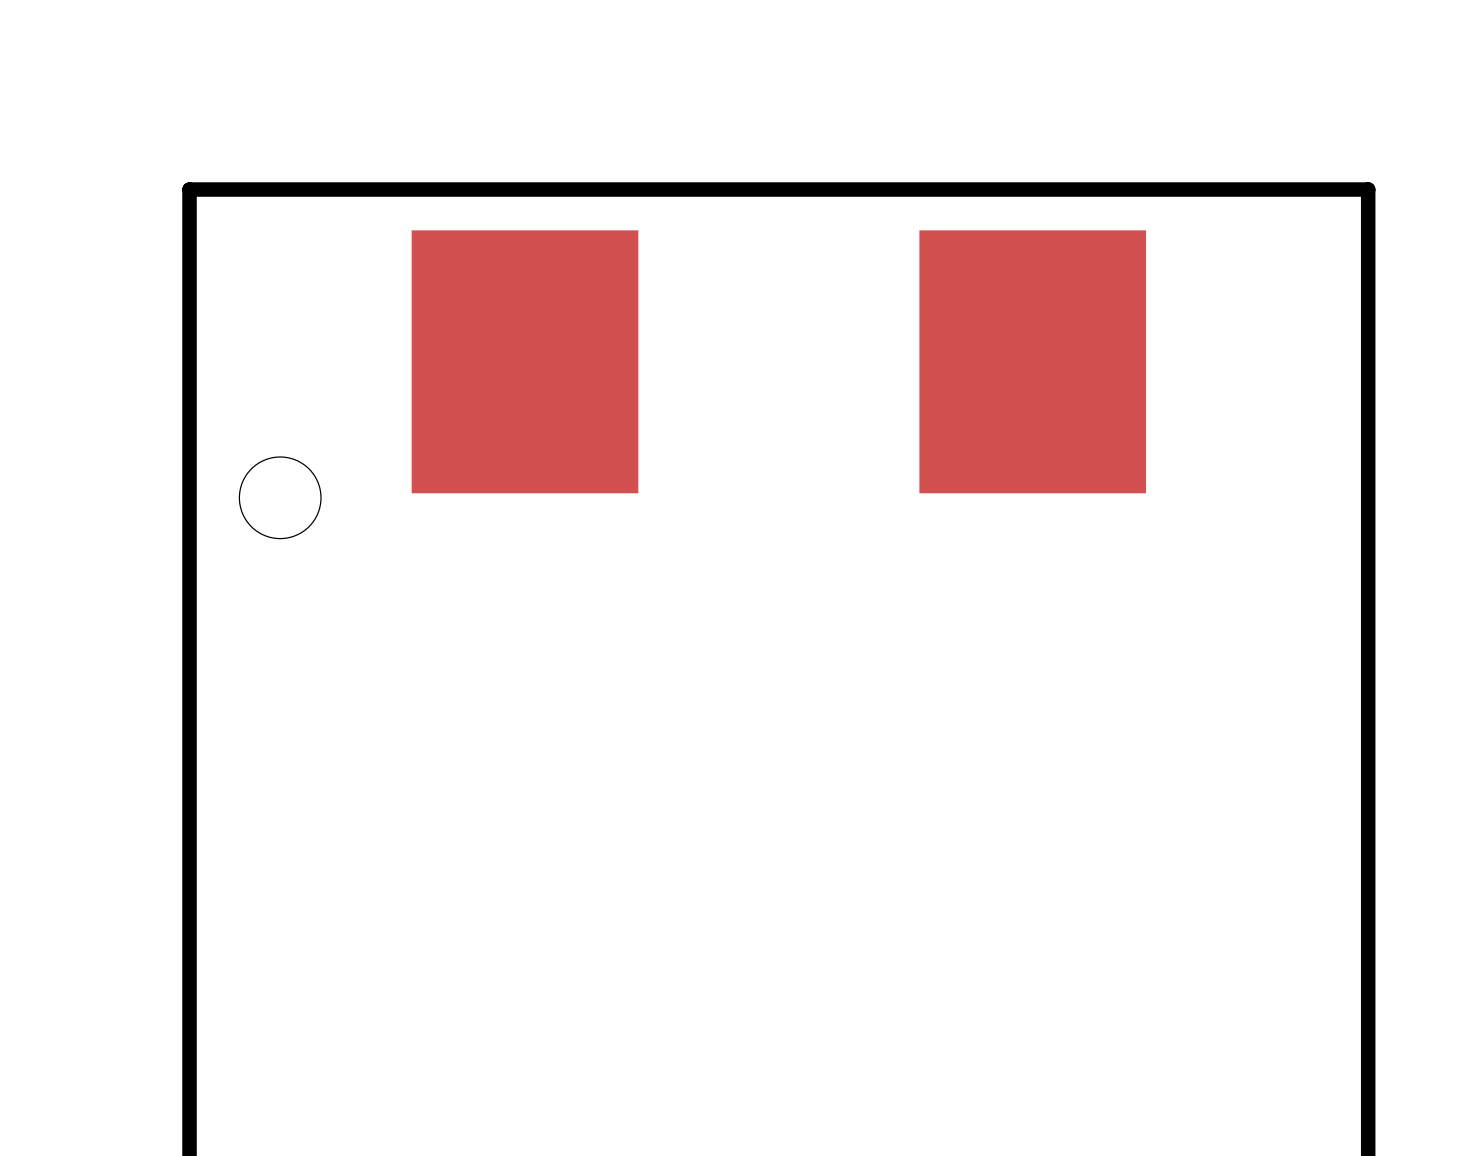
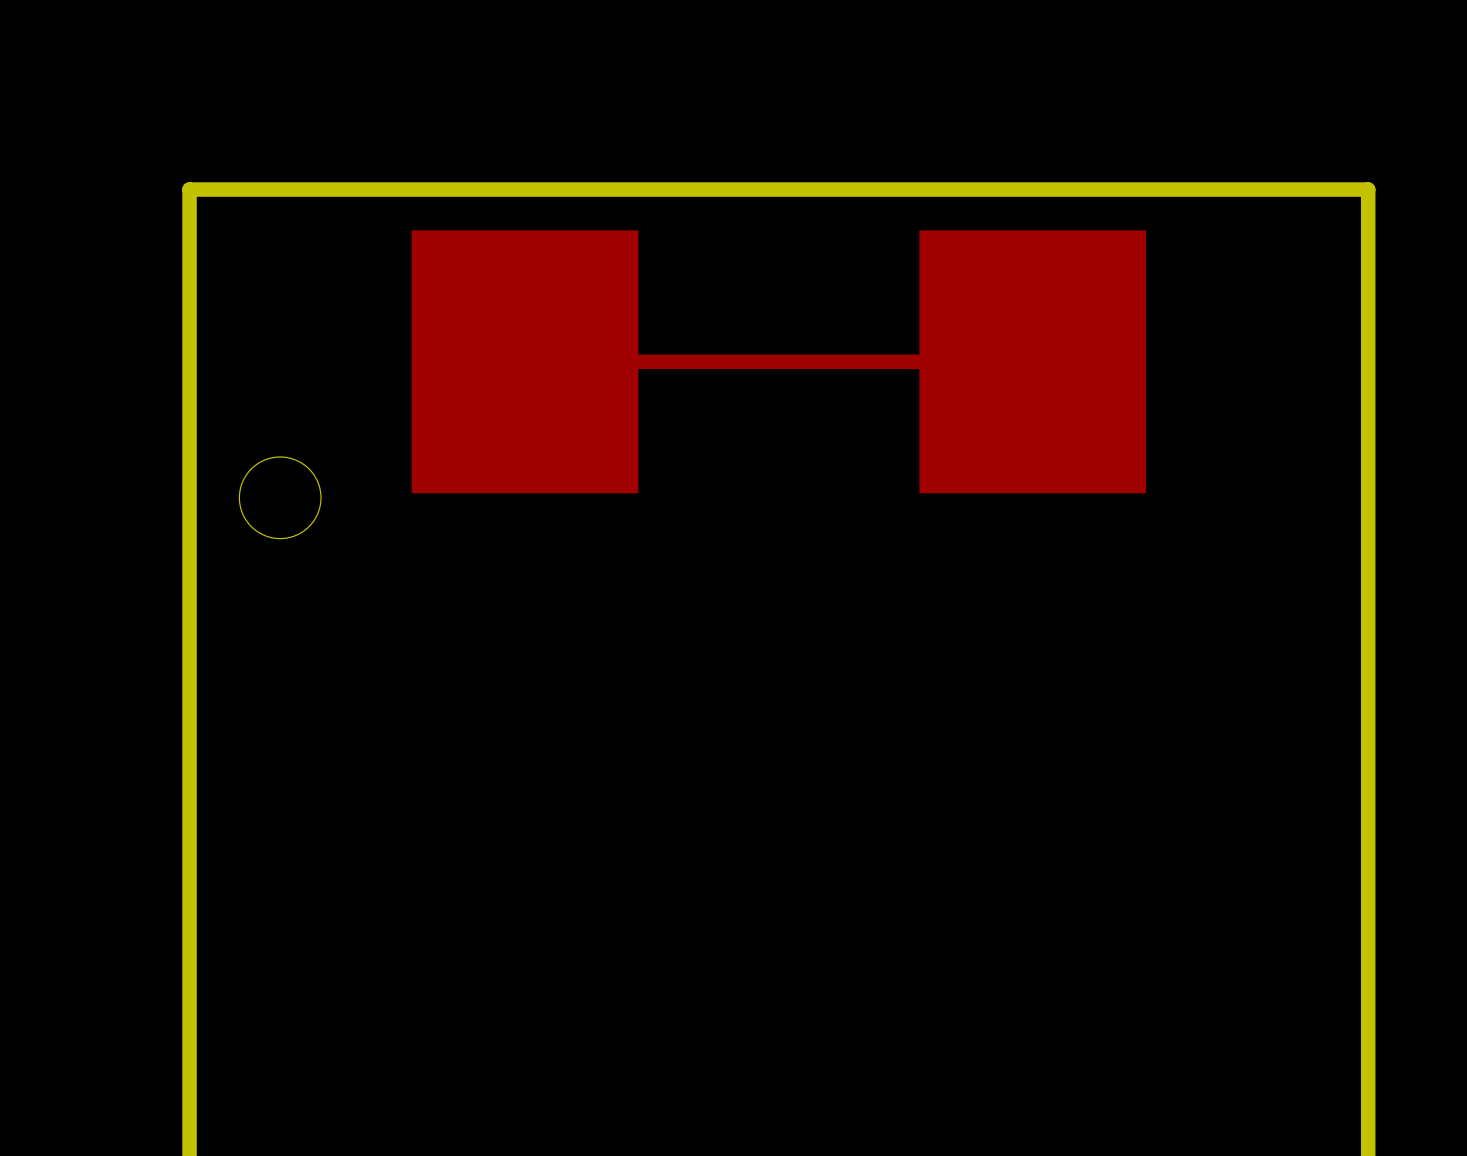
top track: none -> (1032, 361) (524, 361)

